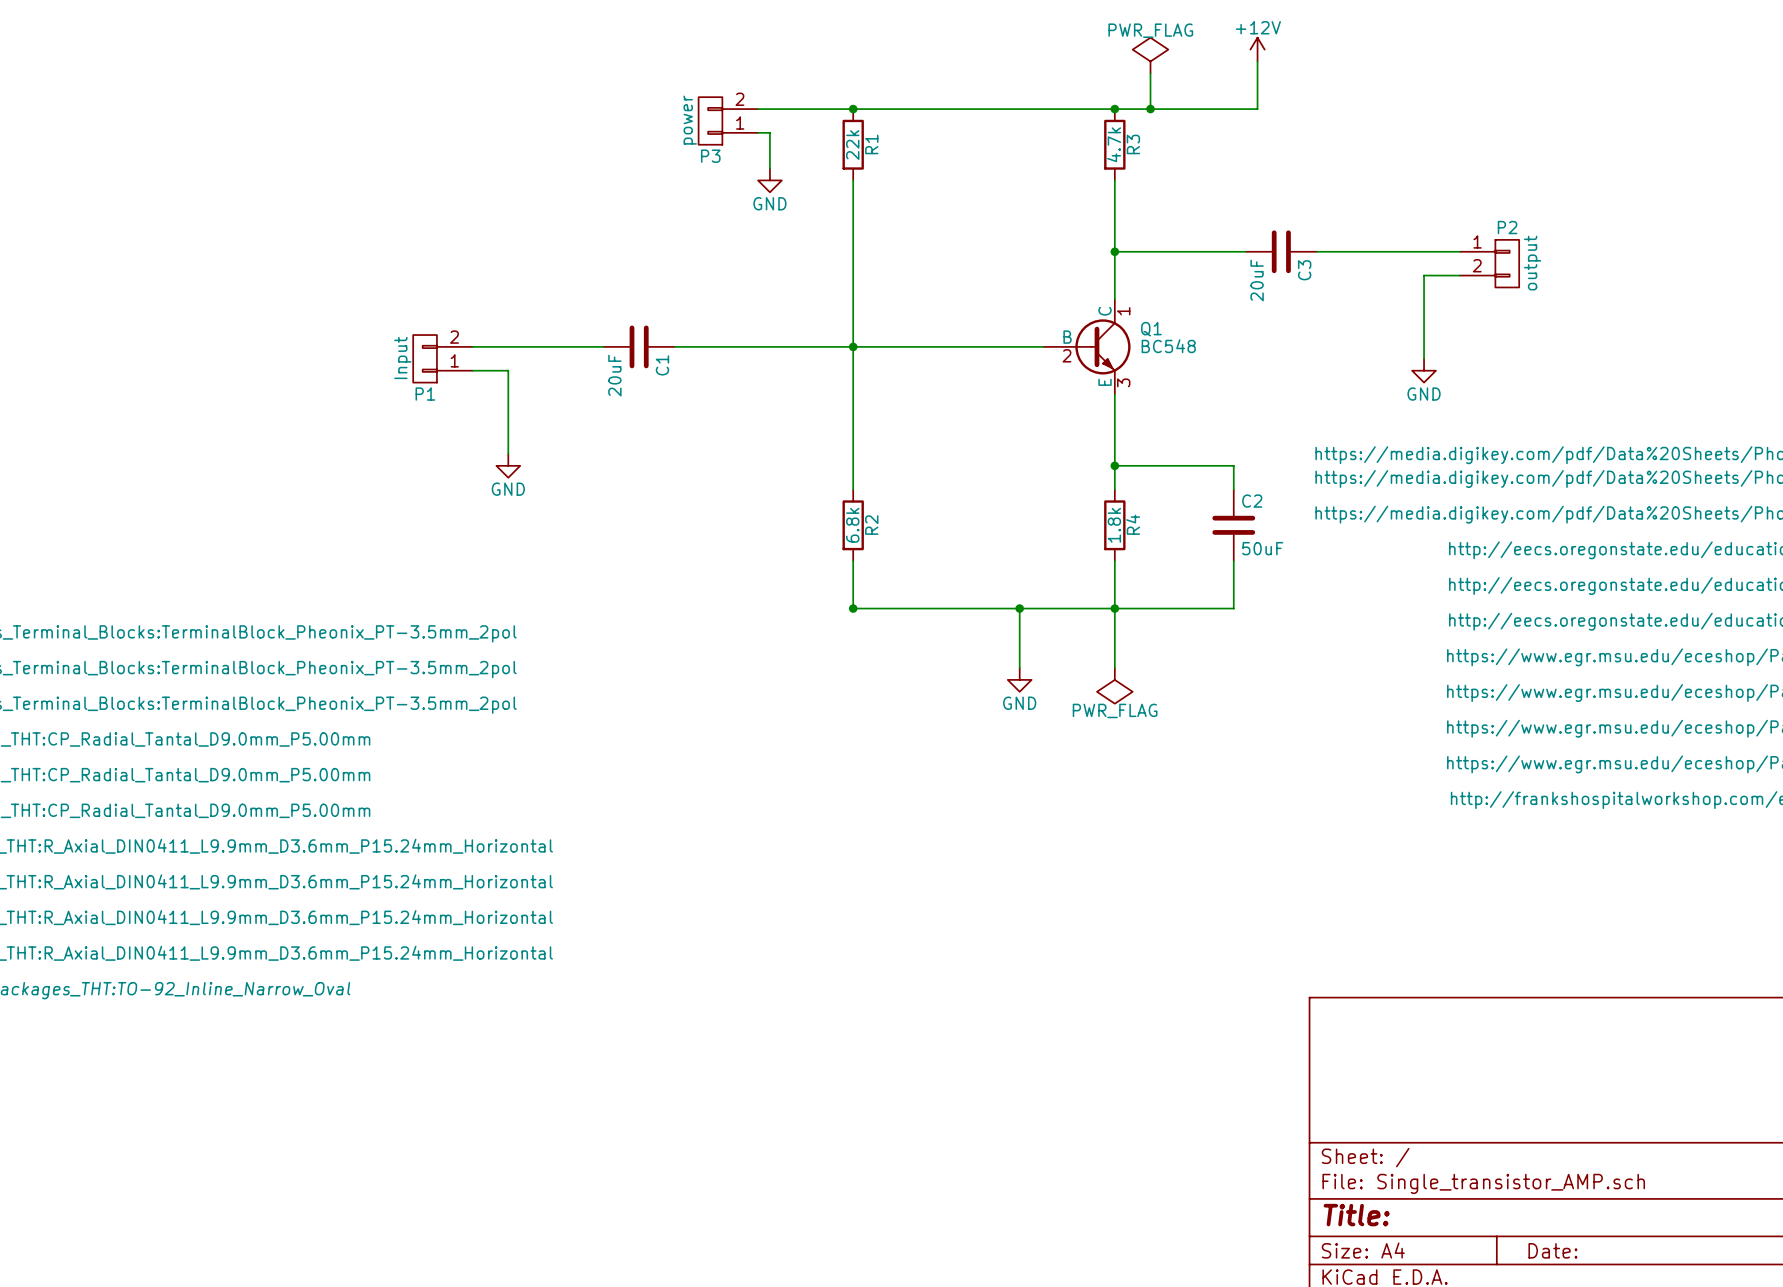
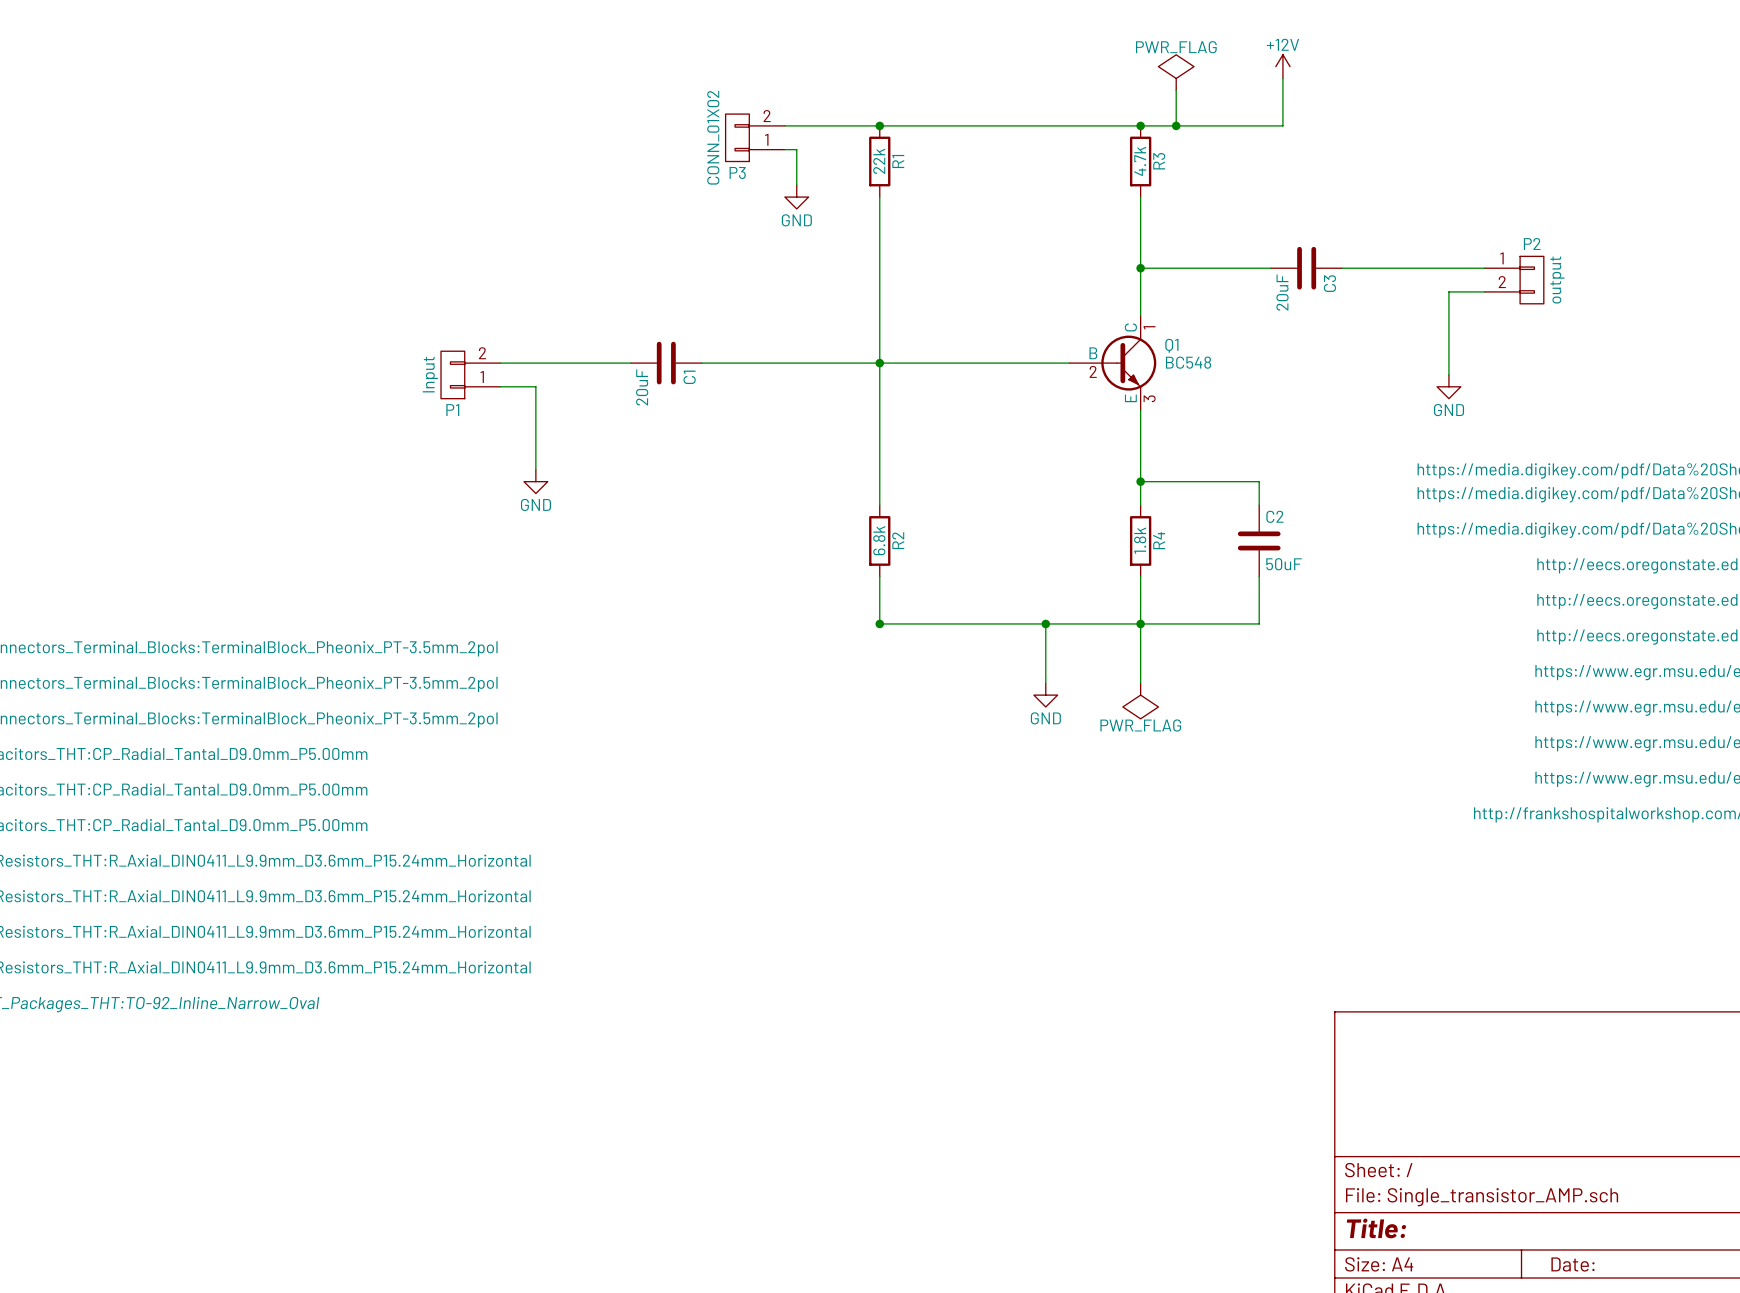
P3 value: power (690, 120) -> CONN_01X02 (713, 137)

